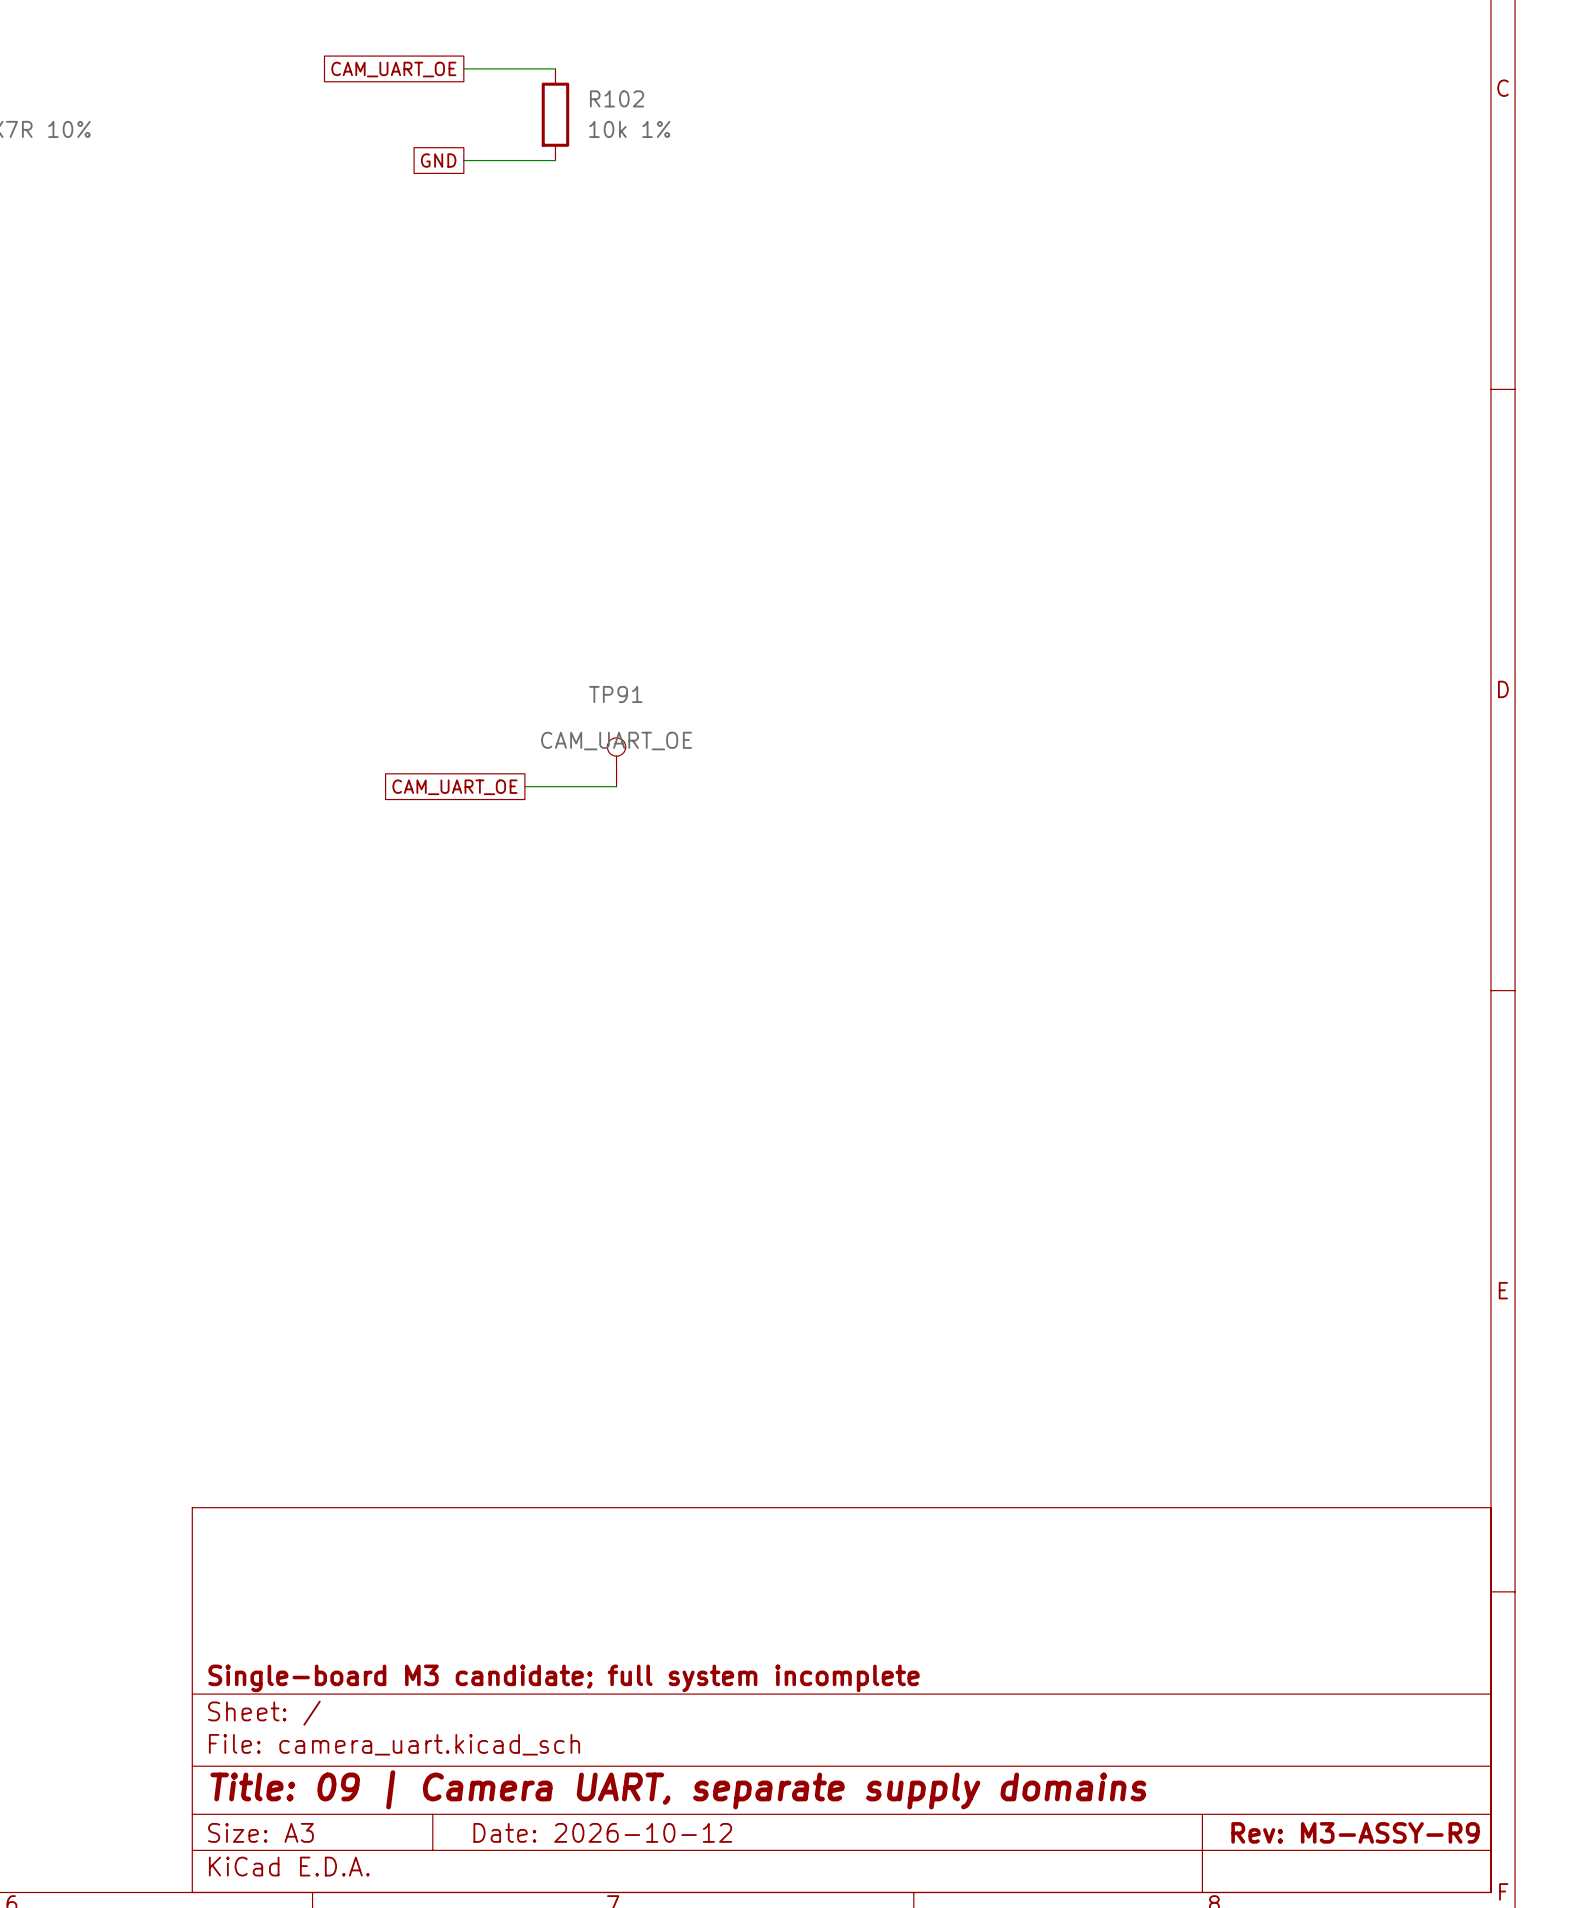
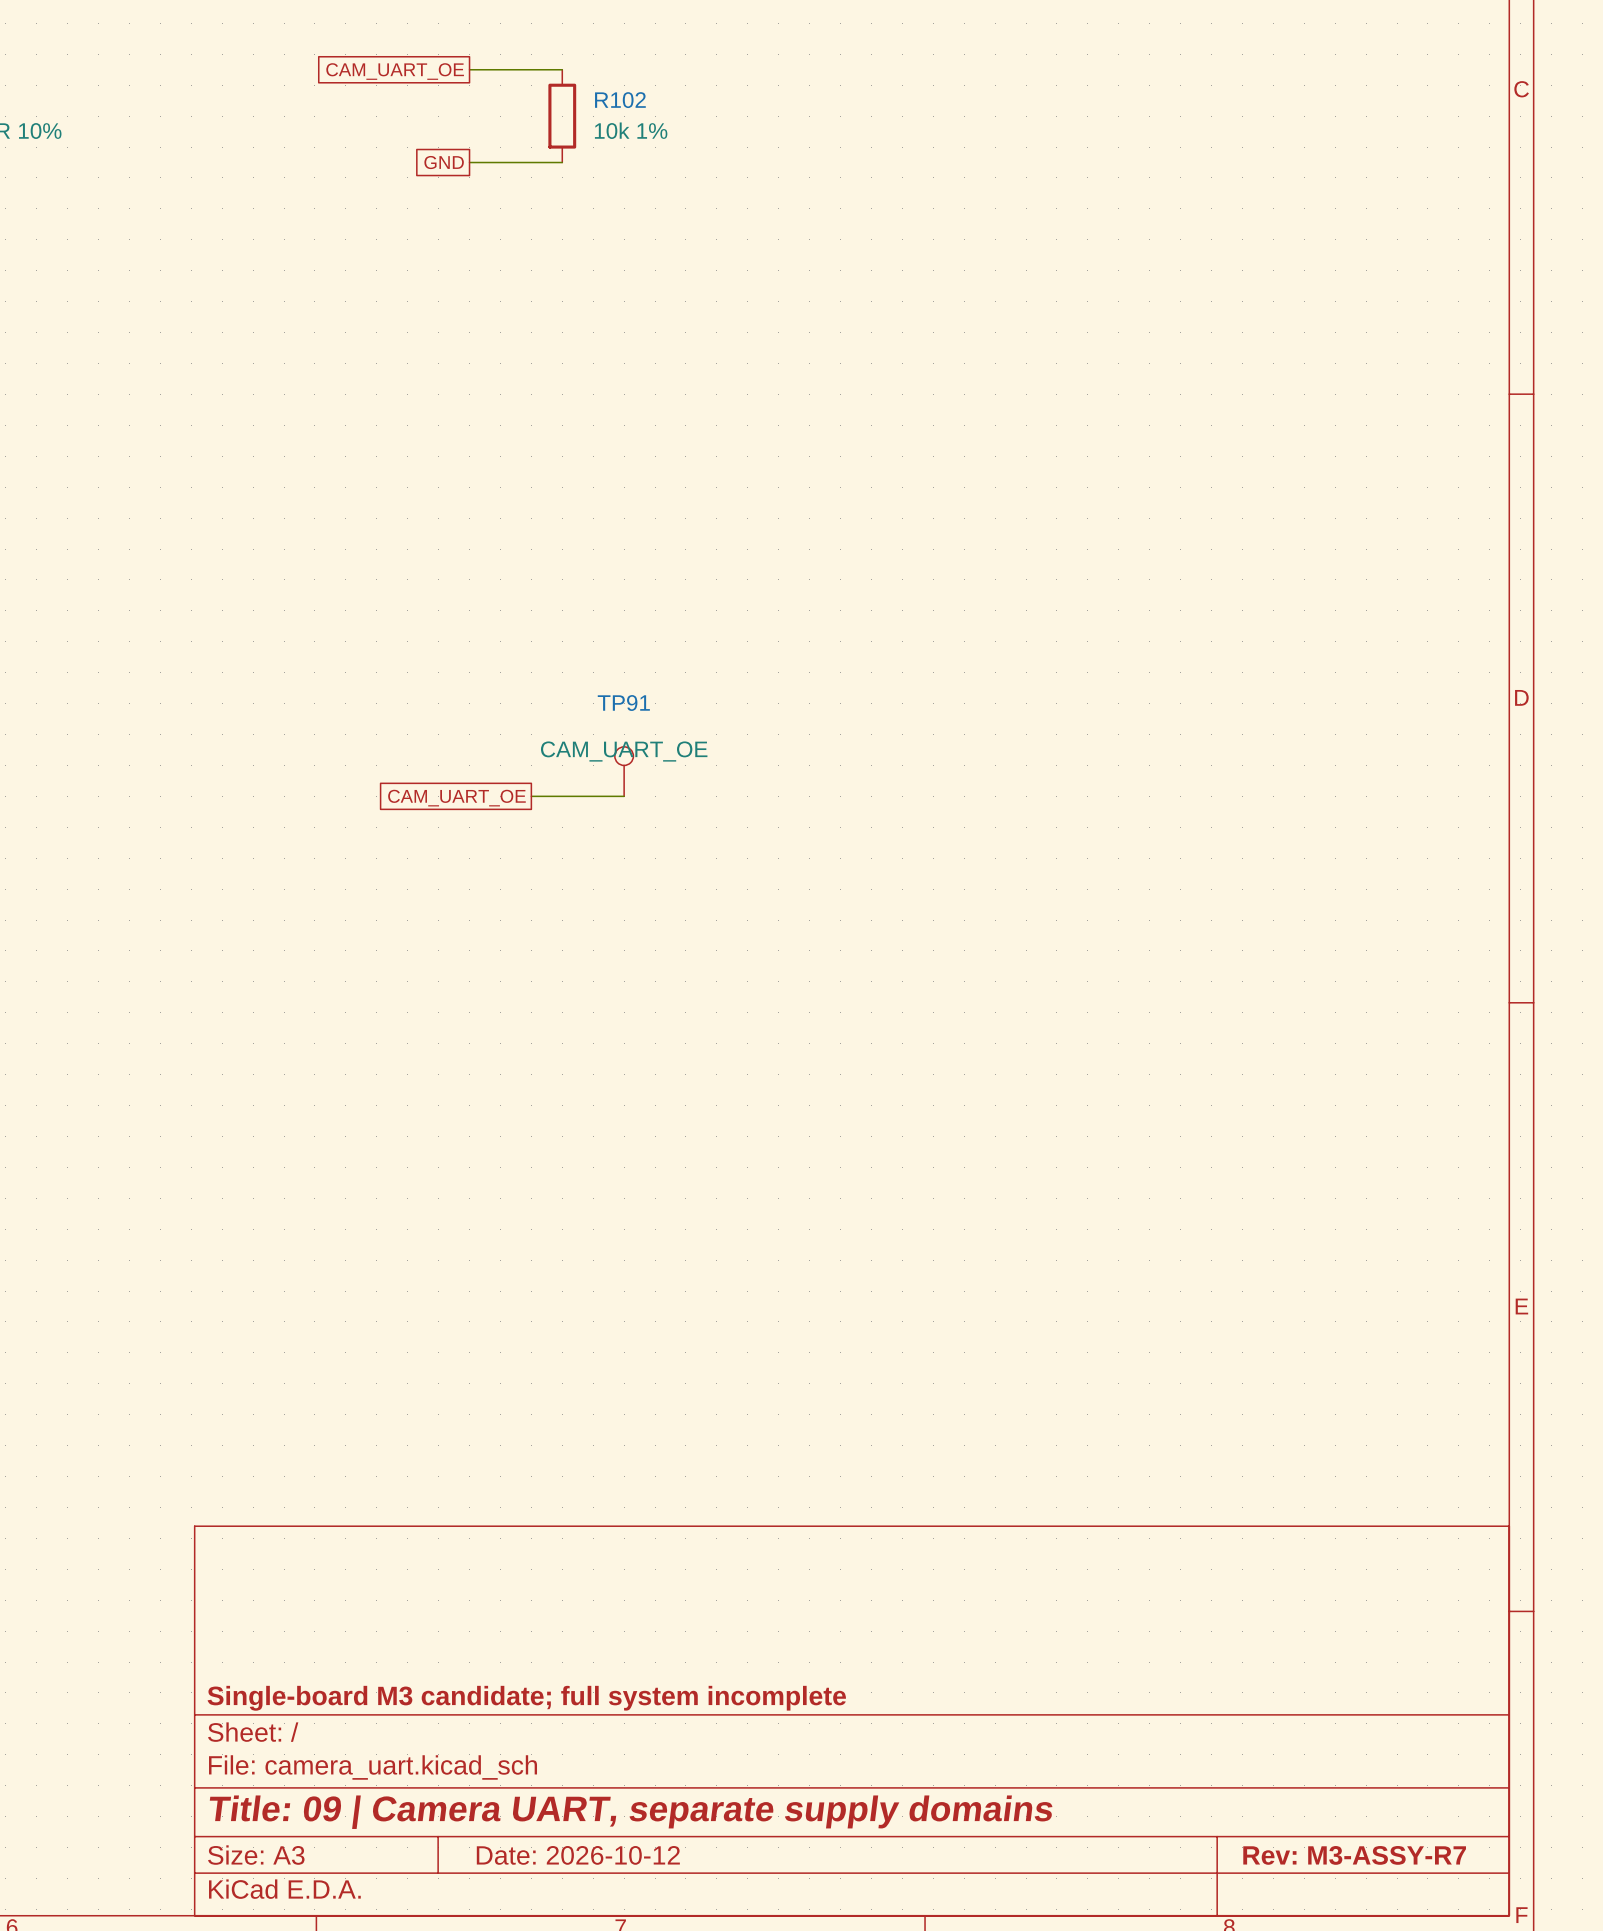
title block: Rev: M3-ASSY-R9 (1355, 1832) -> Rev: M3-ASSY-R7 (1354, 1855)

